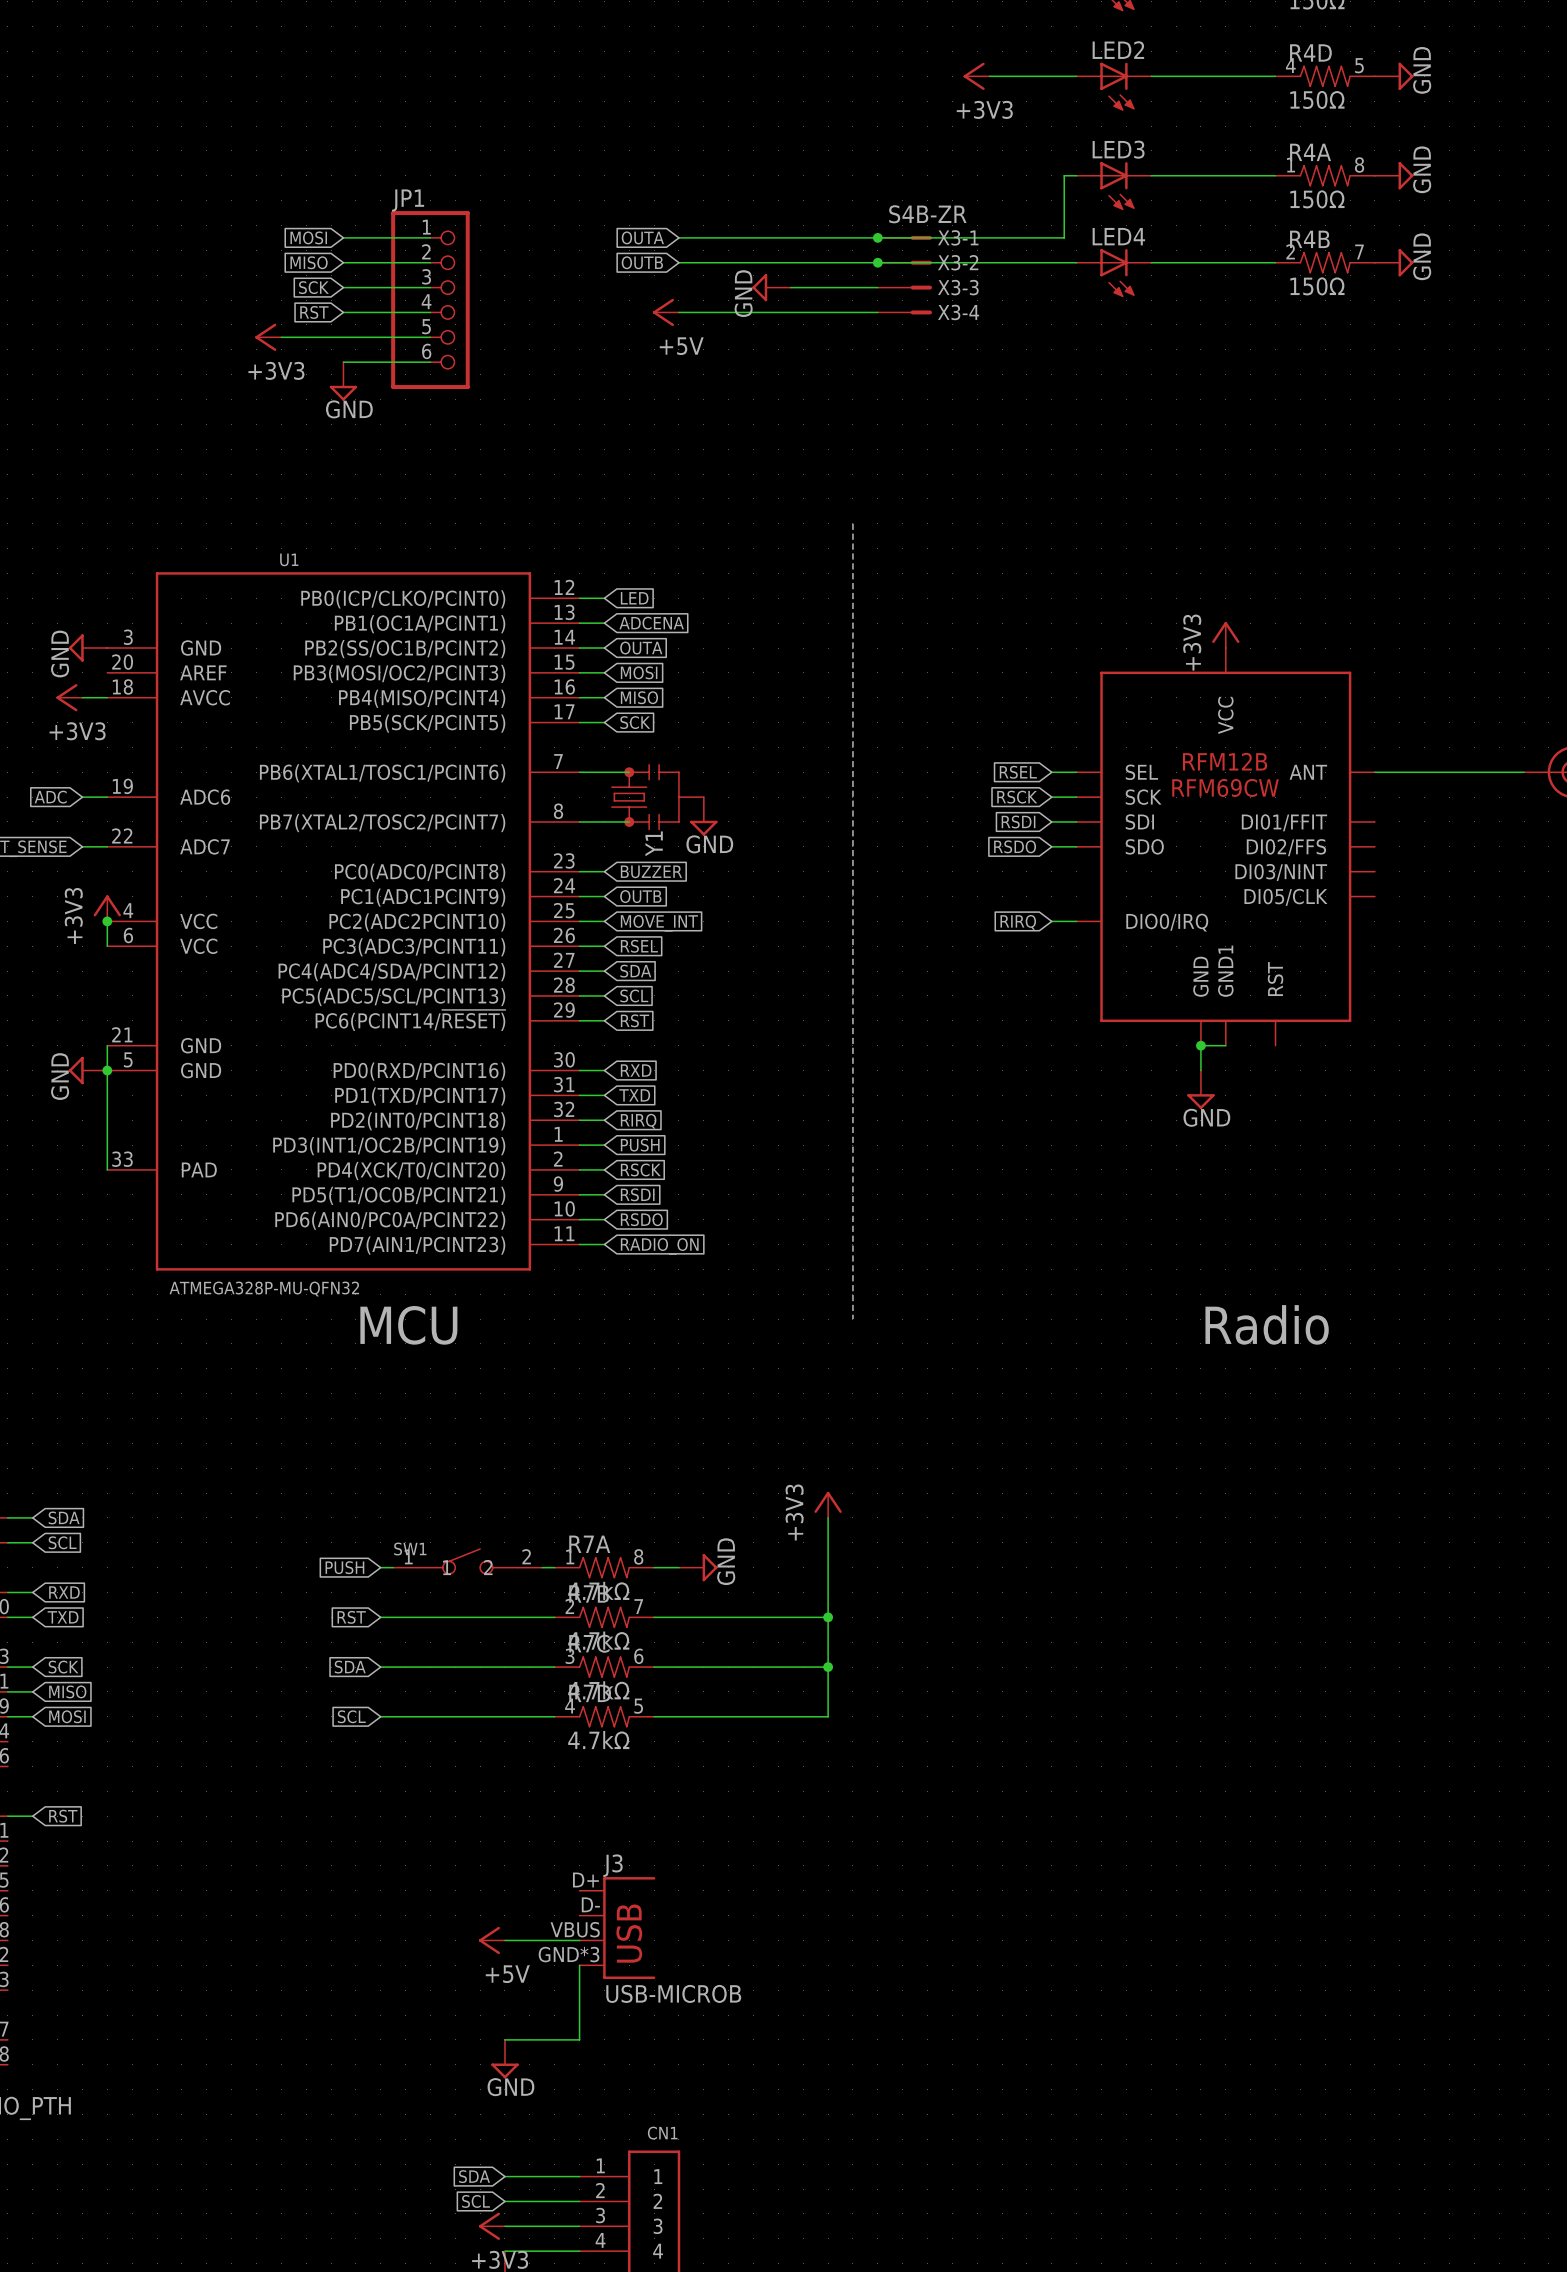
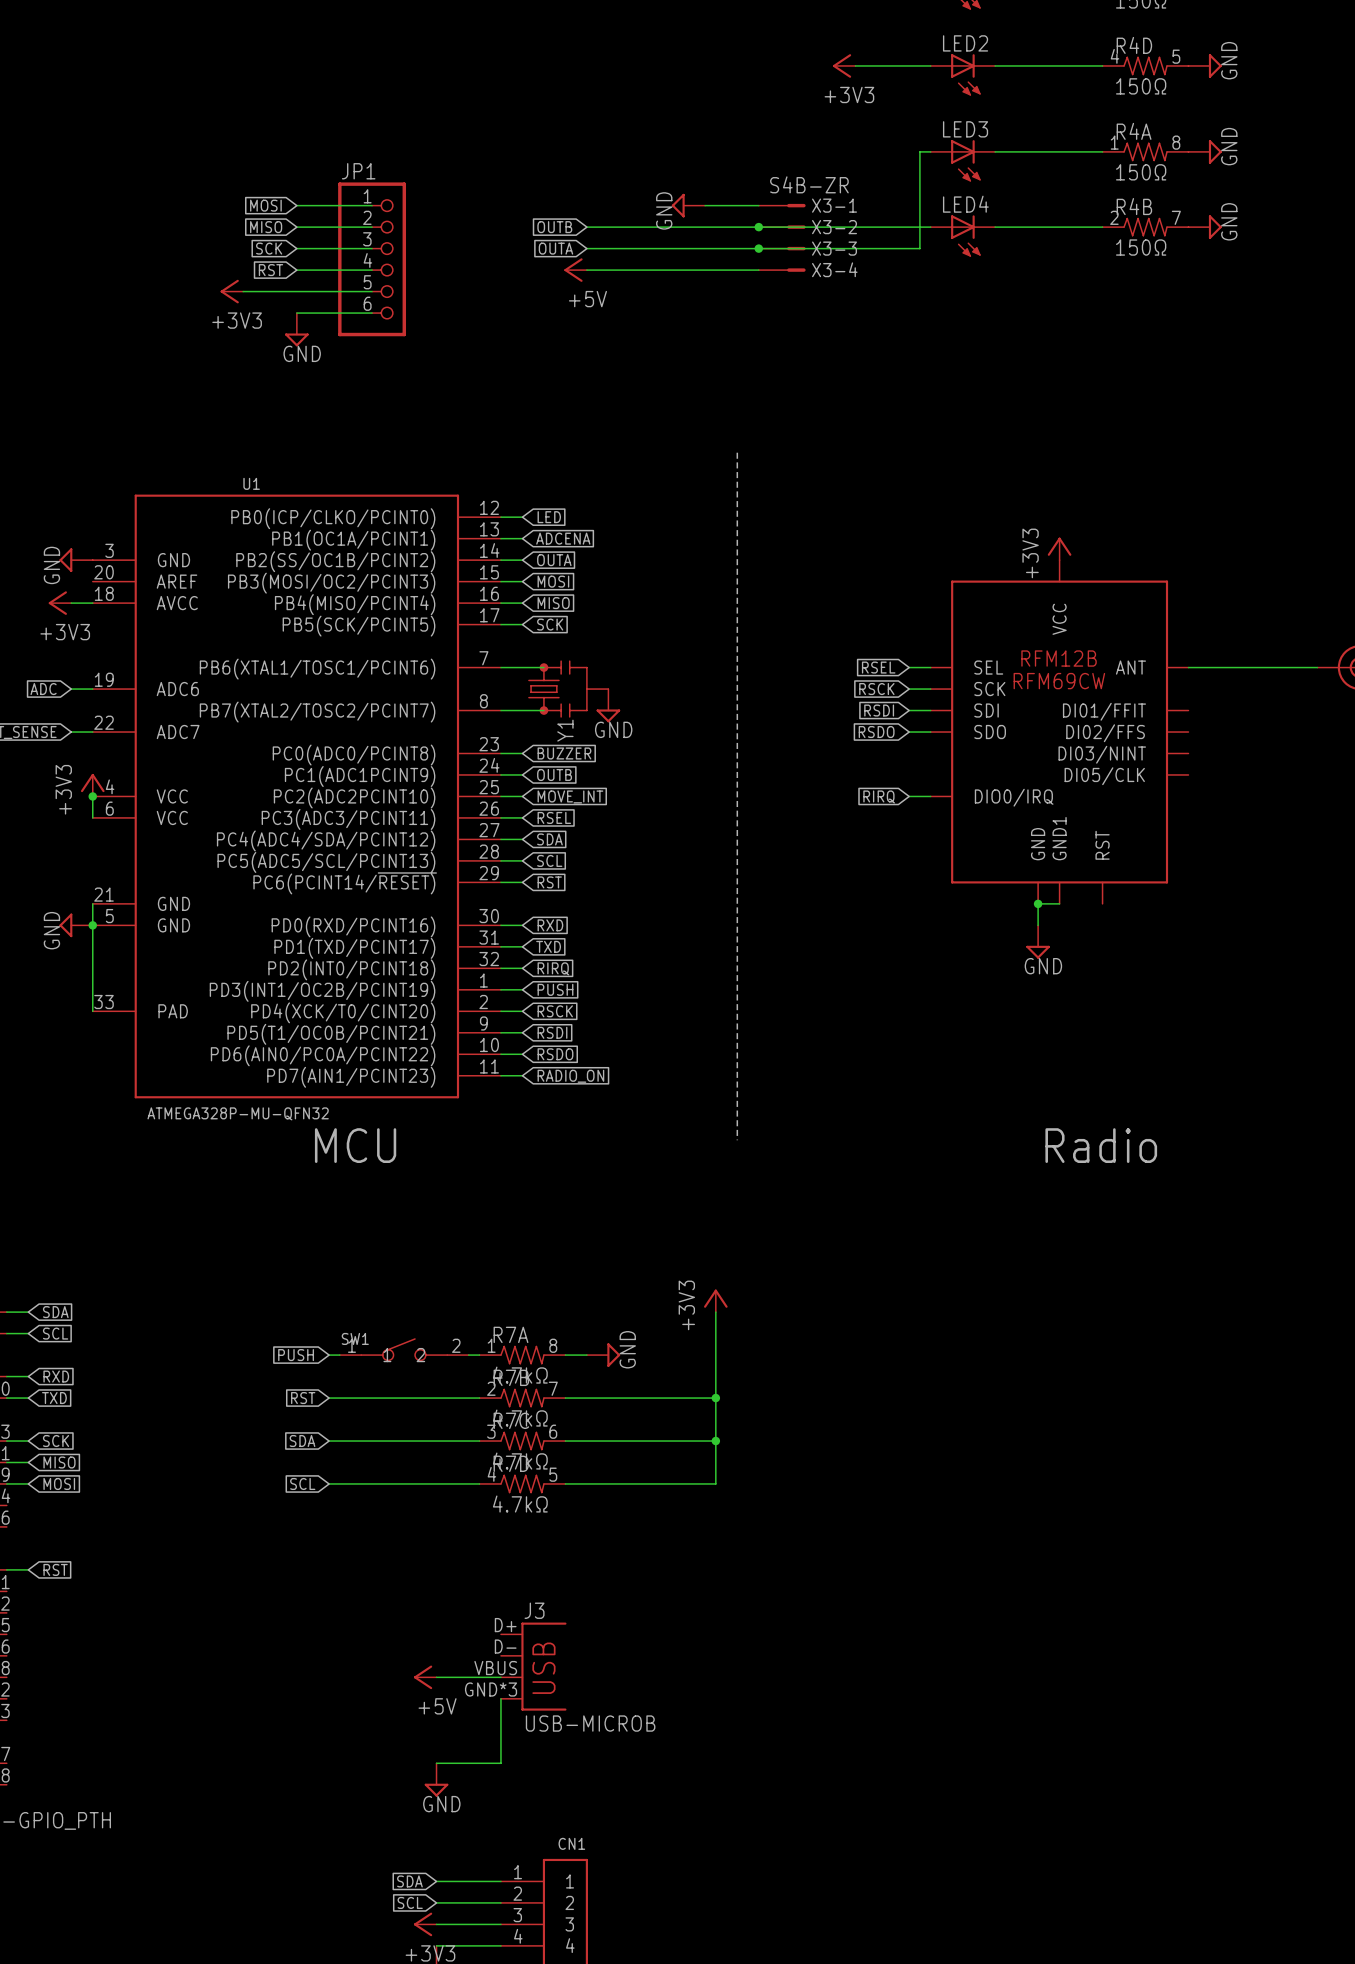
global label position: OUTA (642, 237) -> OUTA (555, 248)
wire: (678, 237) (815, 237) -> none
wire: (877, 237) (1064, 237) -> (758, 248) (919, 248) (919, 205)
junction position: (877, 237) -> (758, 248)
wire: none -> (586, 248) (683, 248)
power symbol position: GND (771, 287) -> GND (688, 205)

